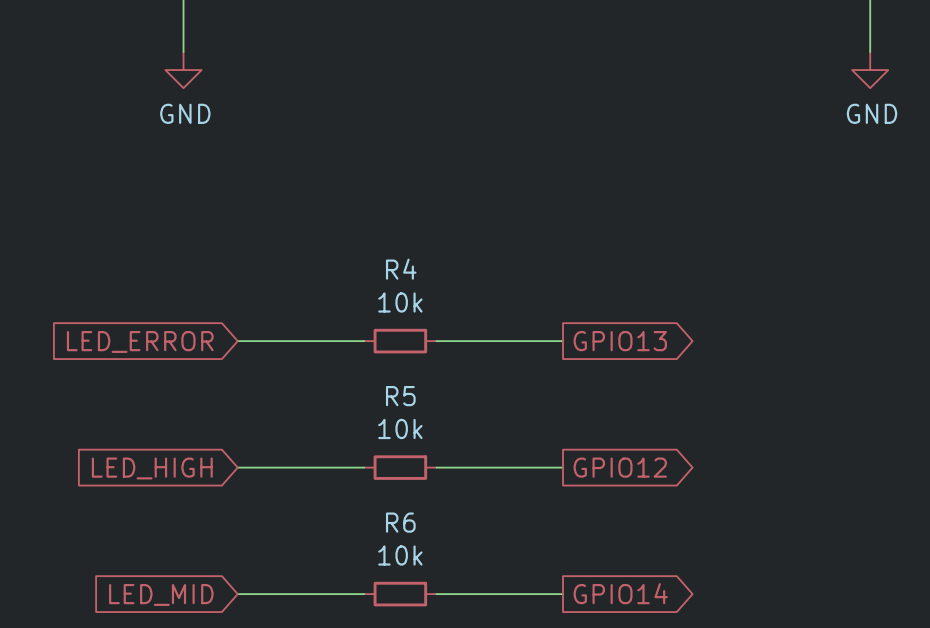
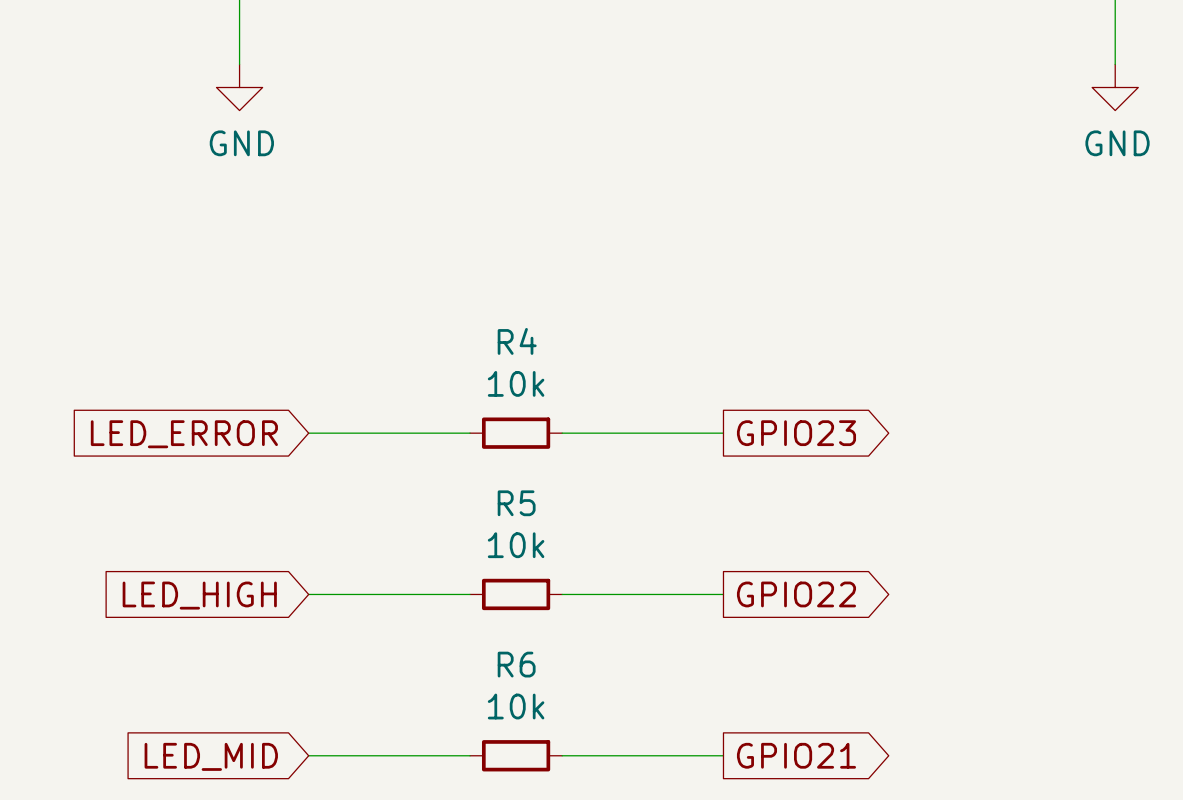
global label: GPIO13 (620, 341) -> GPIO23 (796, 433)
global label: GPIO12 (620, 467) -> GPIO22 (796, 594)
global label: GPIO14 (620, 593) -> GPIO21 (796, 755)

